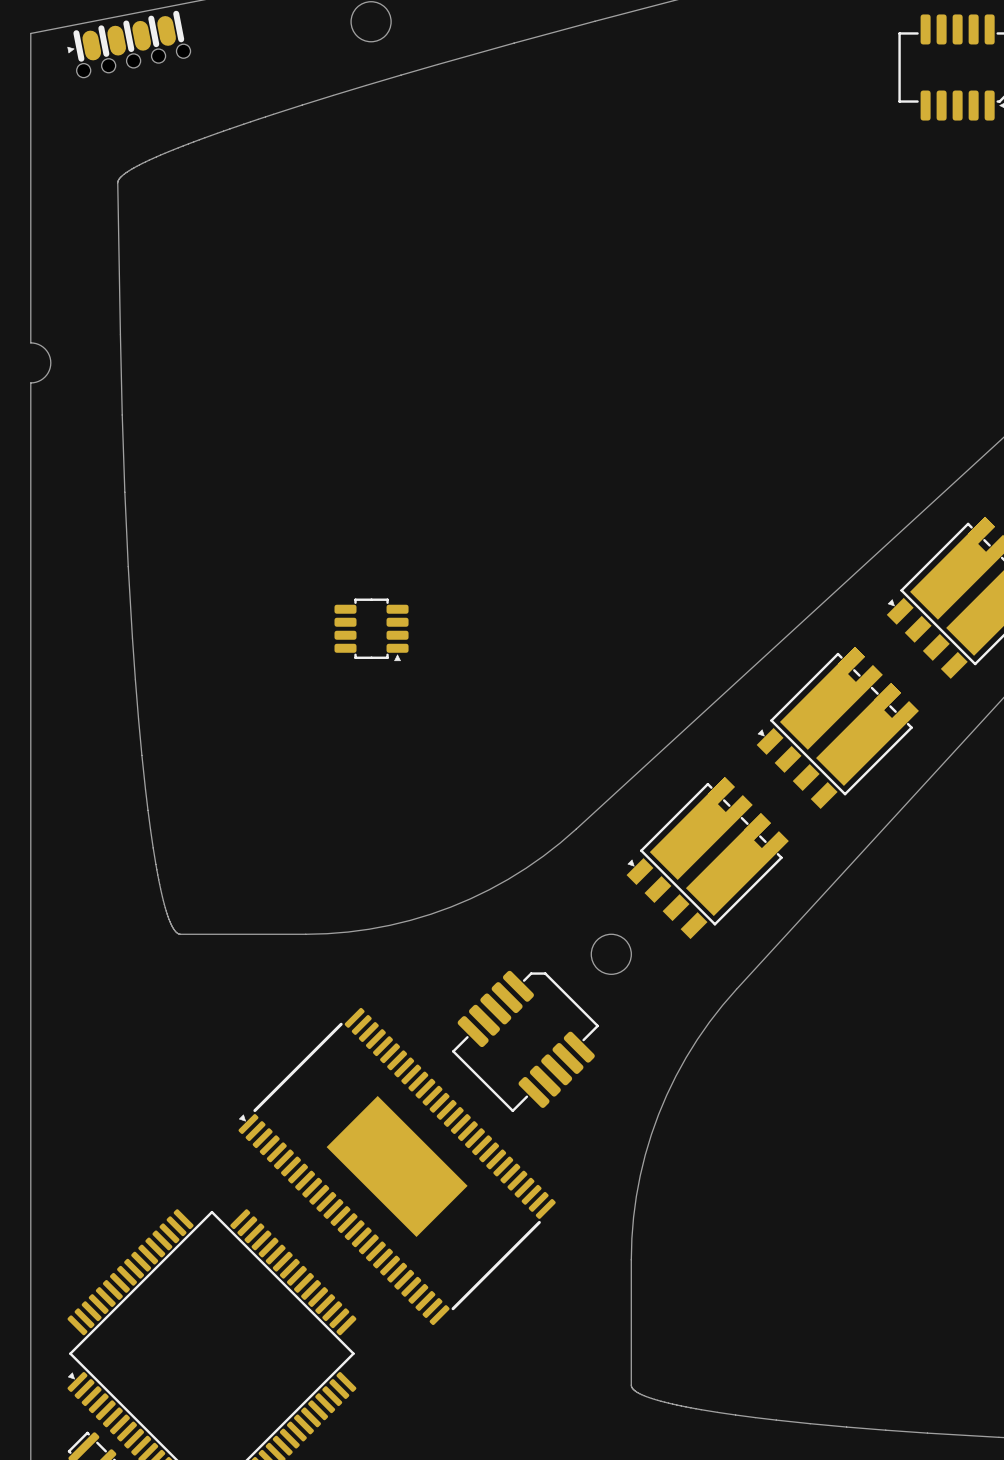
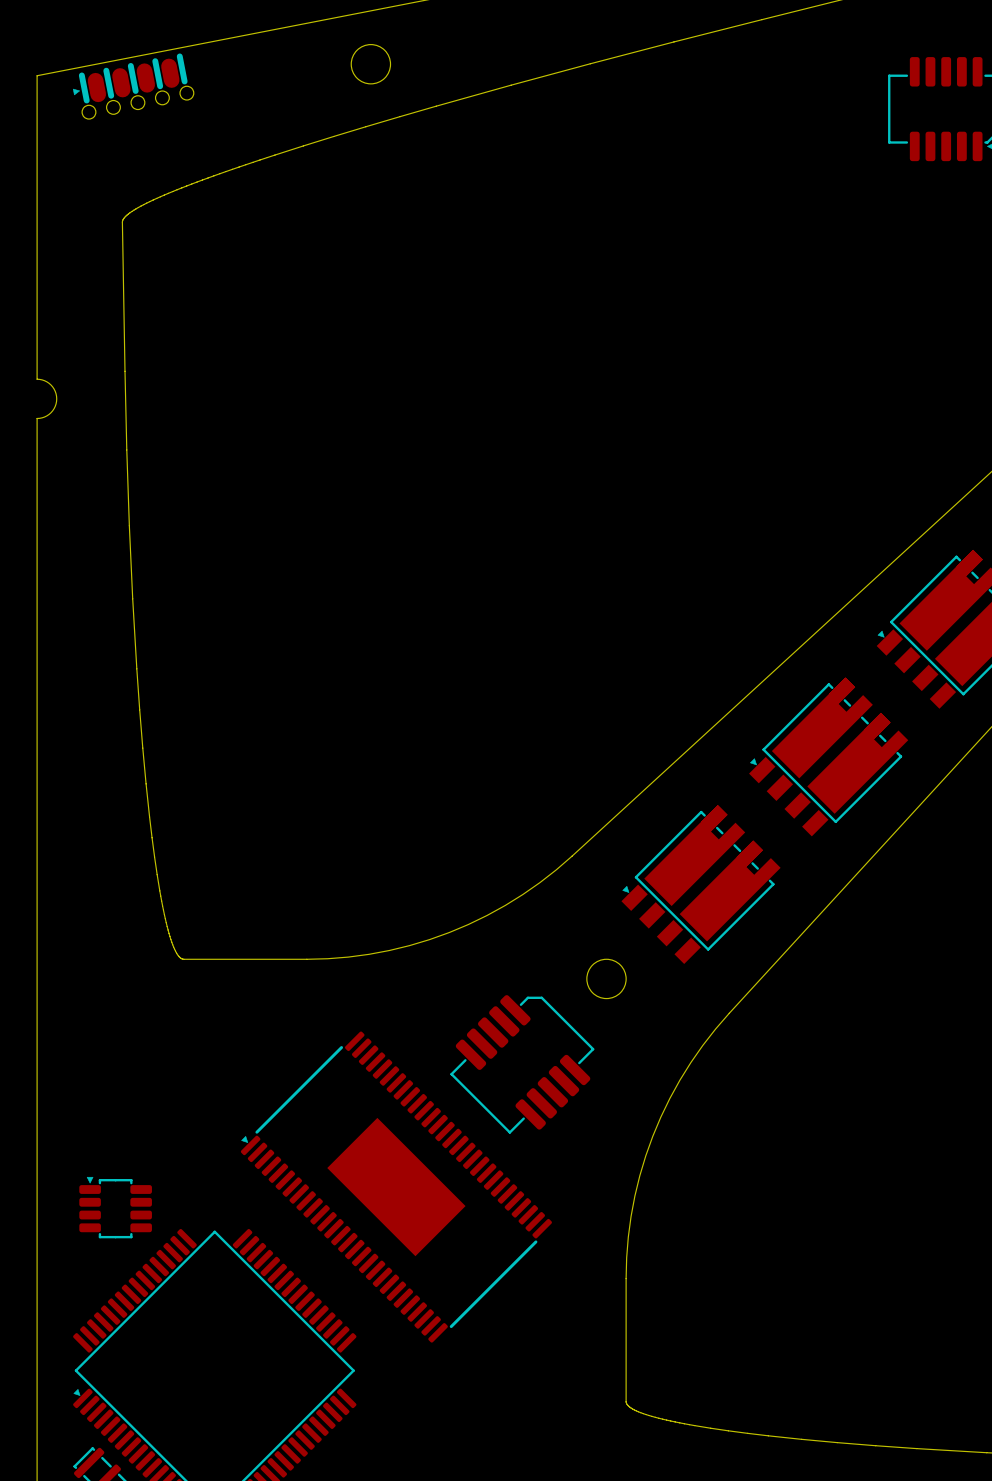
part: (371, 629) -> none
part: none -> (115, 1207)

